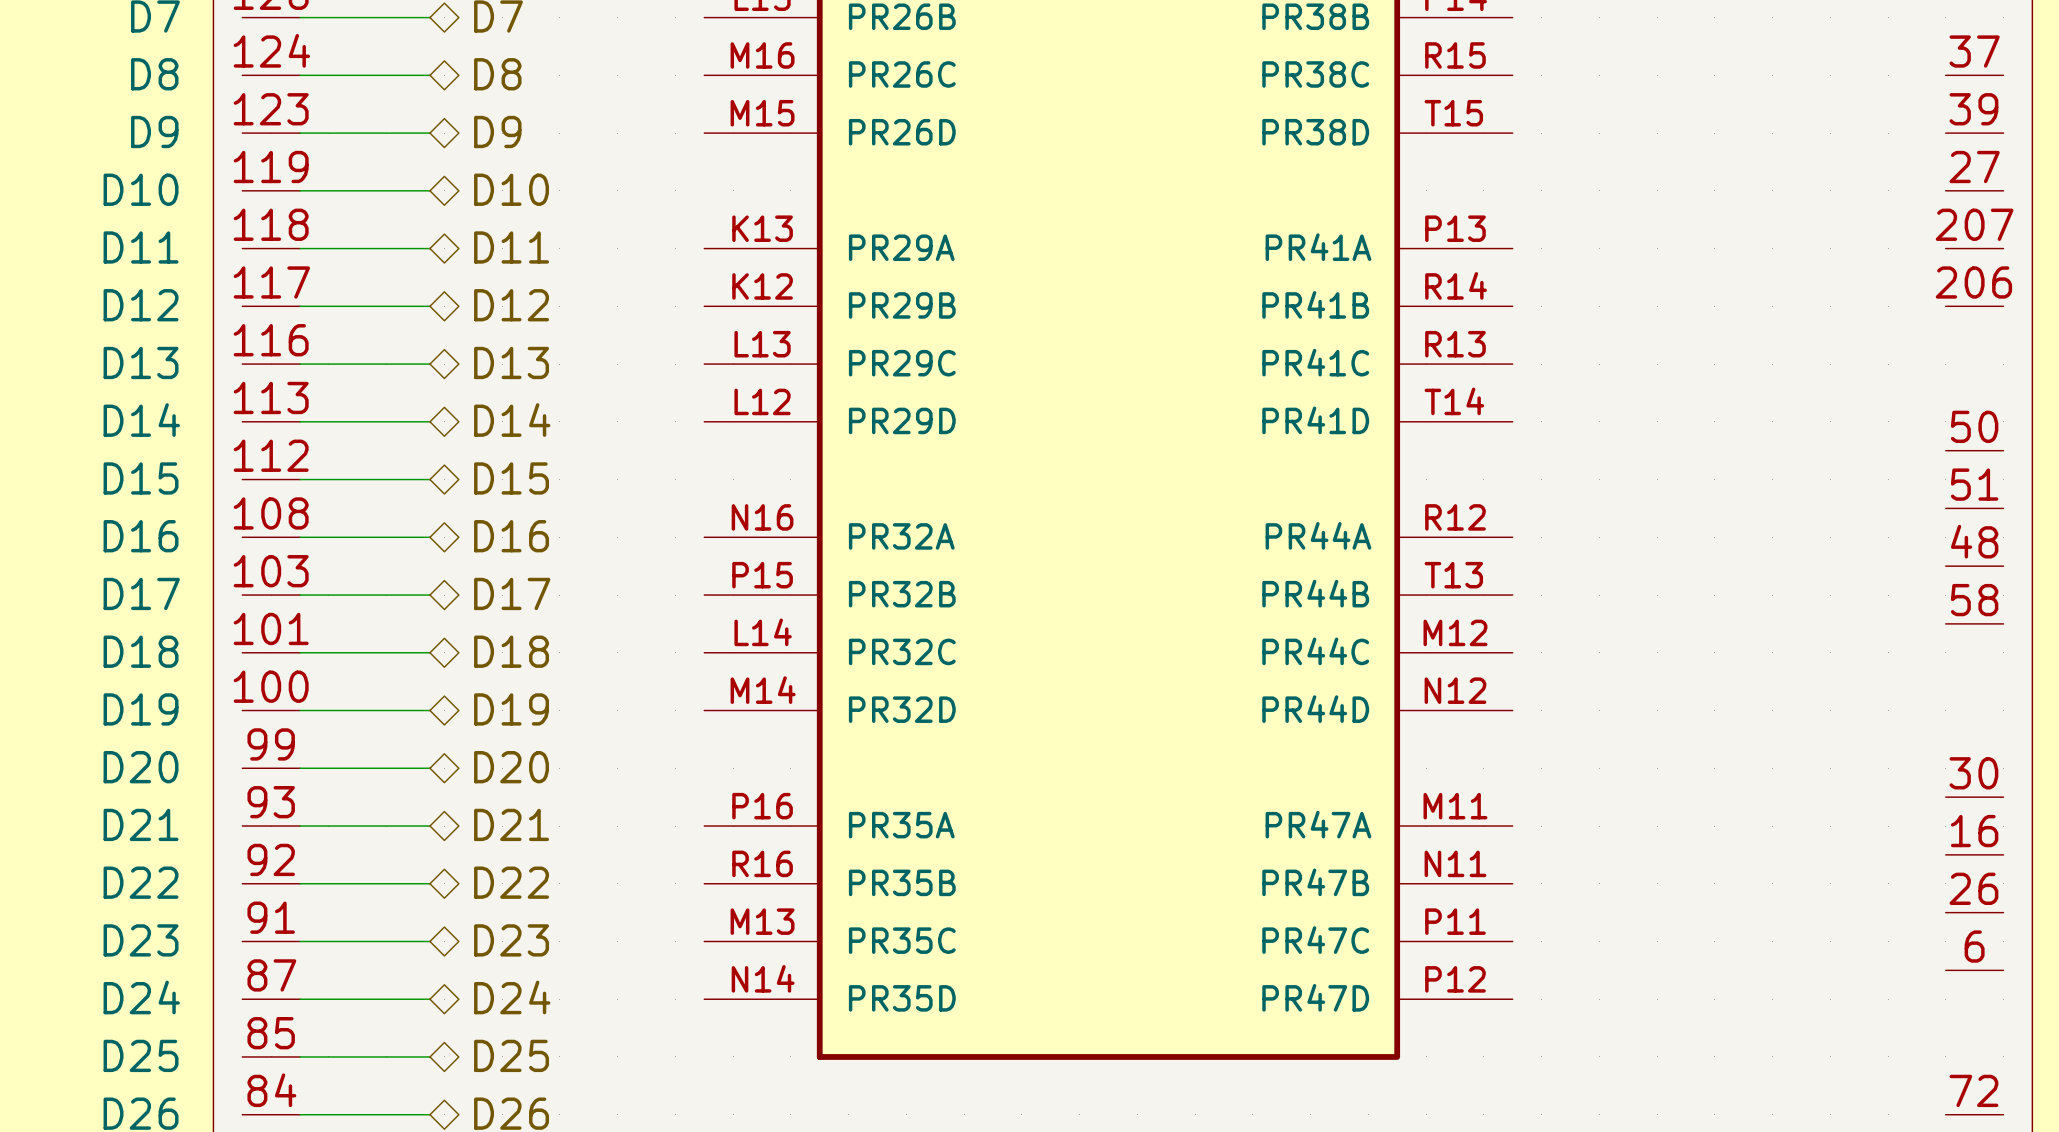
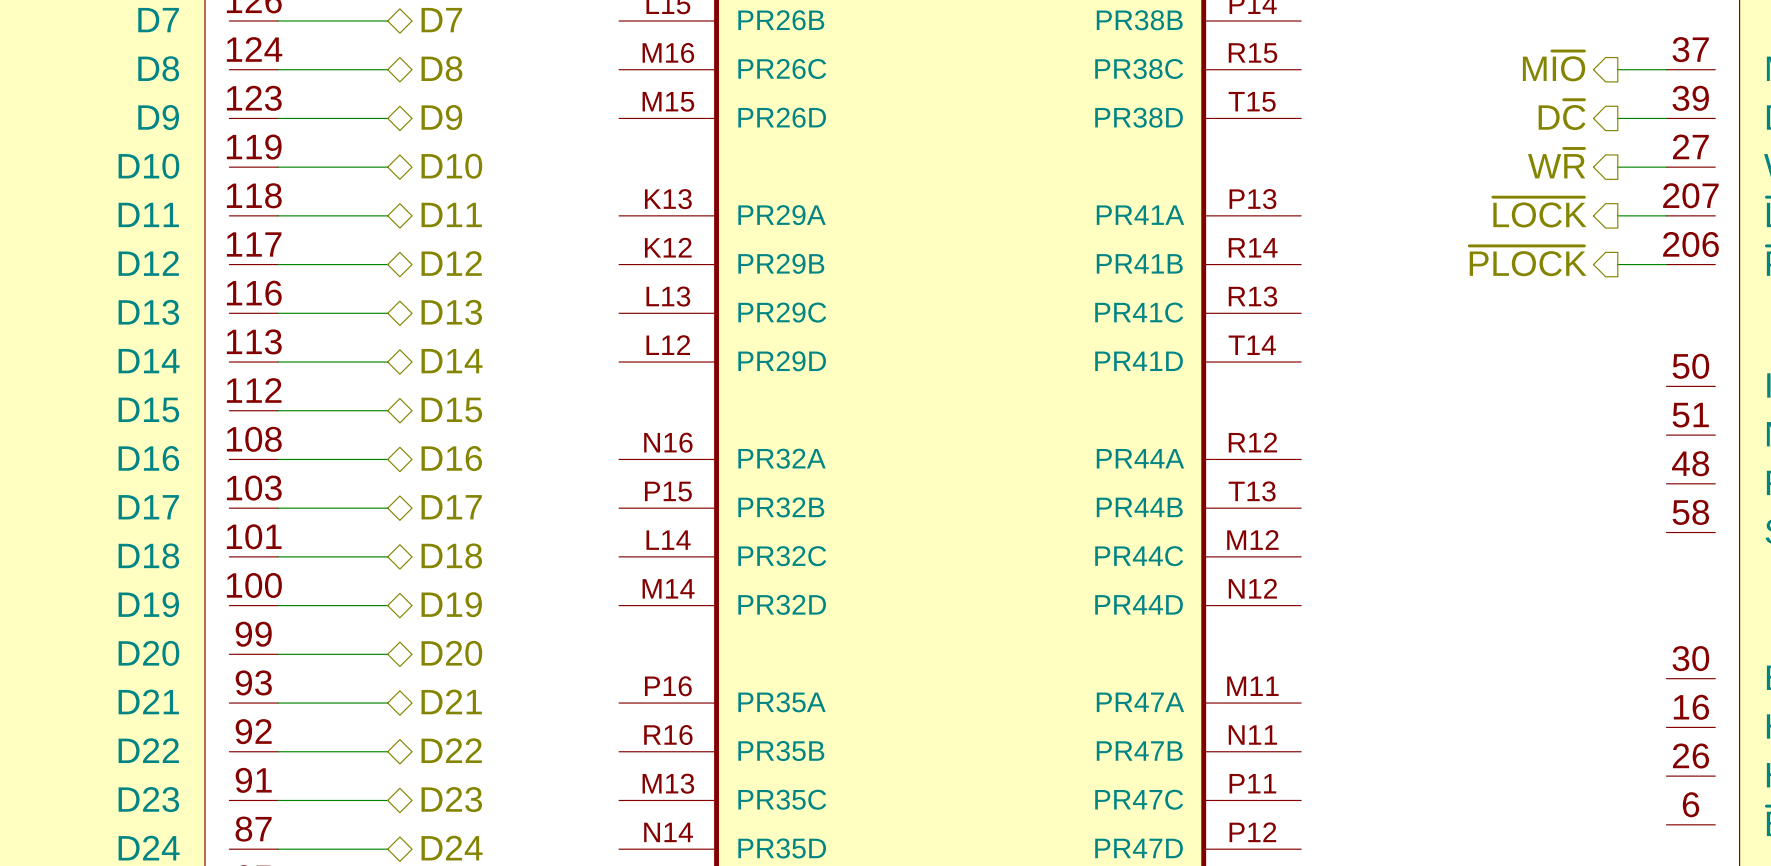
hierarchical label: none -> M~{IO} (1554, 66)
wire: none -> (1617, 69) (1666, 69)
hierarchical label: none -> D~{C} (1562, 114)
wire: none -> (1617, 118) (1666, 118)
hierarchical label: none -> W~{R} (1556, 163)
wire: none -> (1617, 167) (1666, 167)
hierarchical label: none -> ~{LOCK} (1539, 212)
wire: none -> (1617, 215) (1666, 215)
hierarchical label: none -> ~{PLOCK} (1527, 261)
wire: none -> (1617, 264) (1666, 264)

